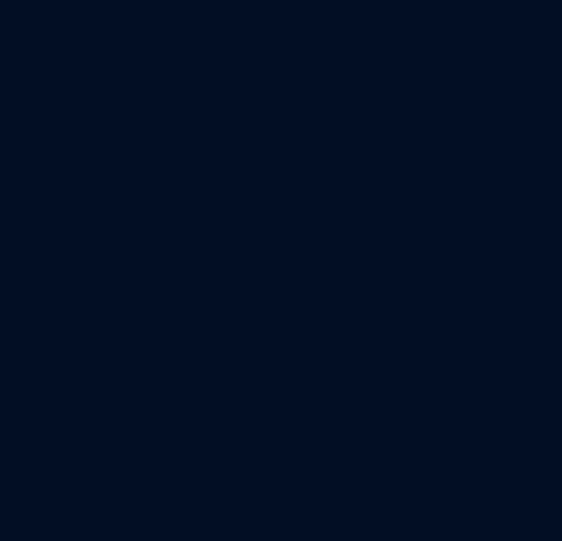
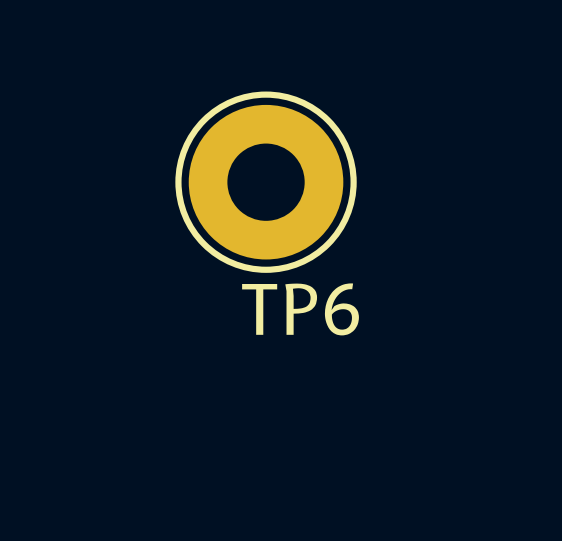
TP6: none -> (266, 182)

